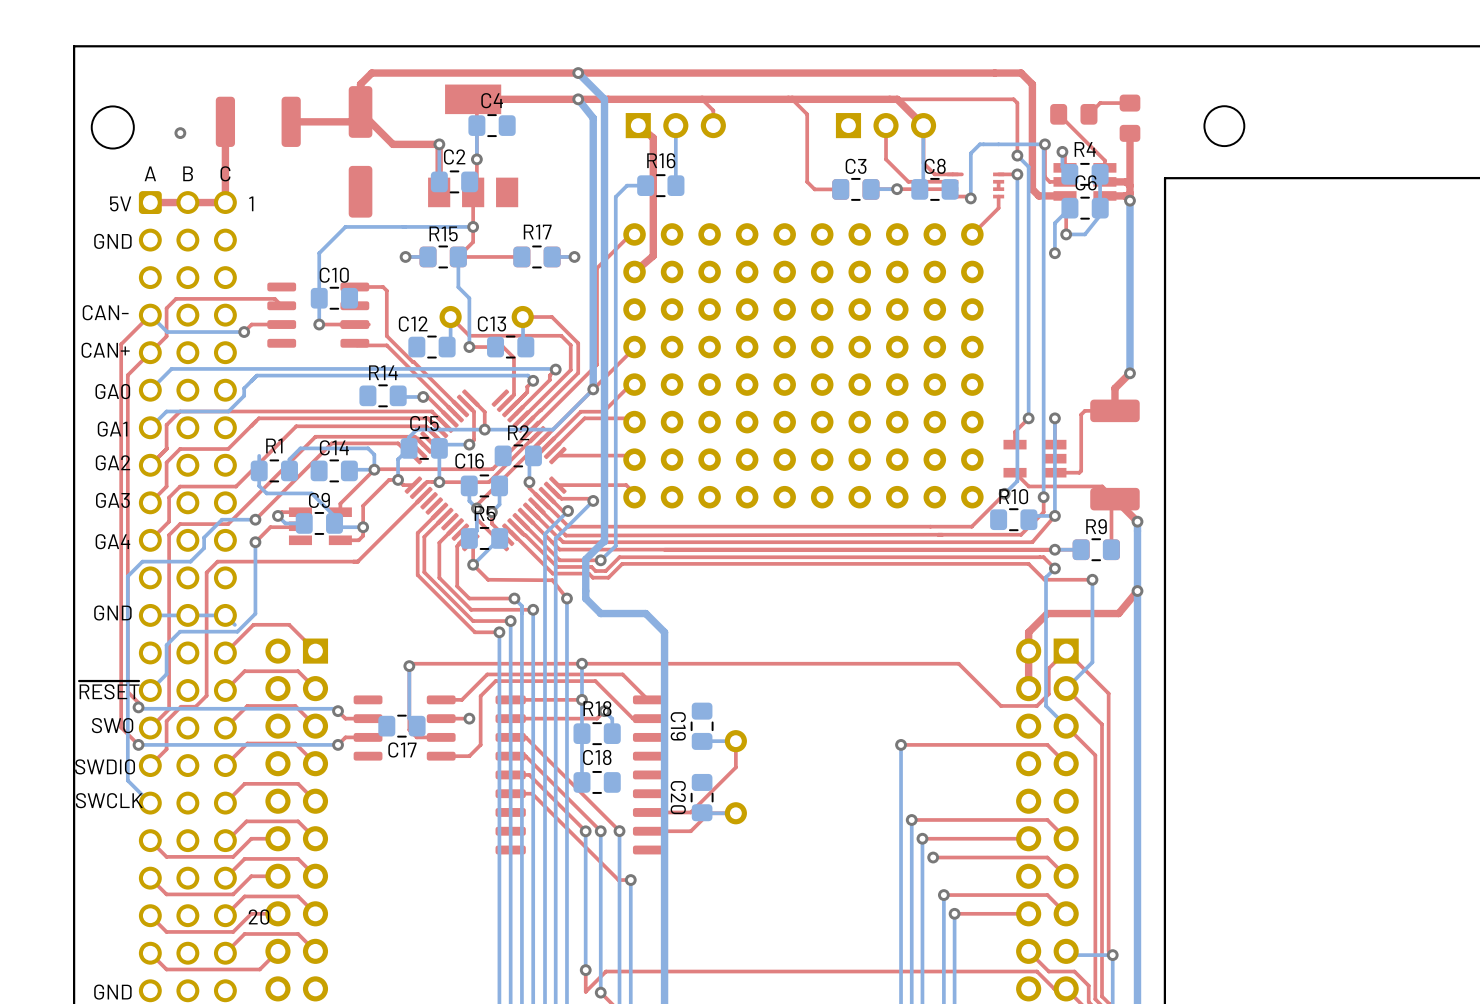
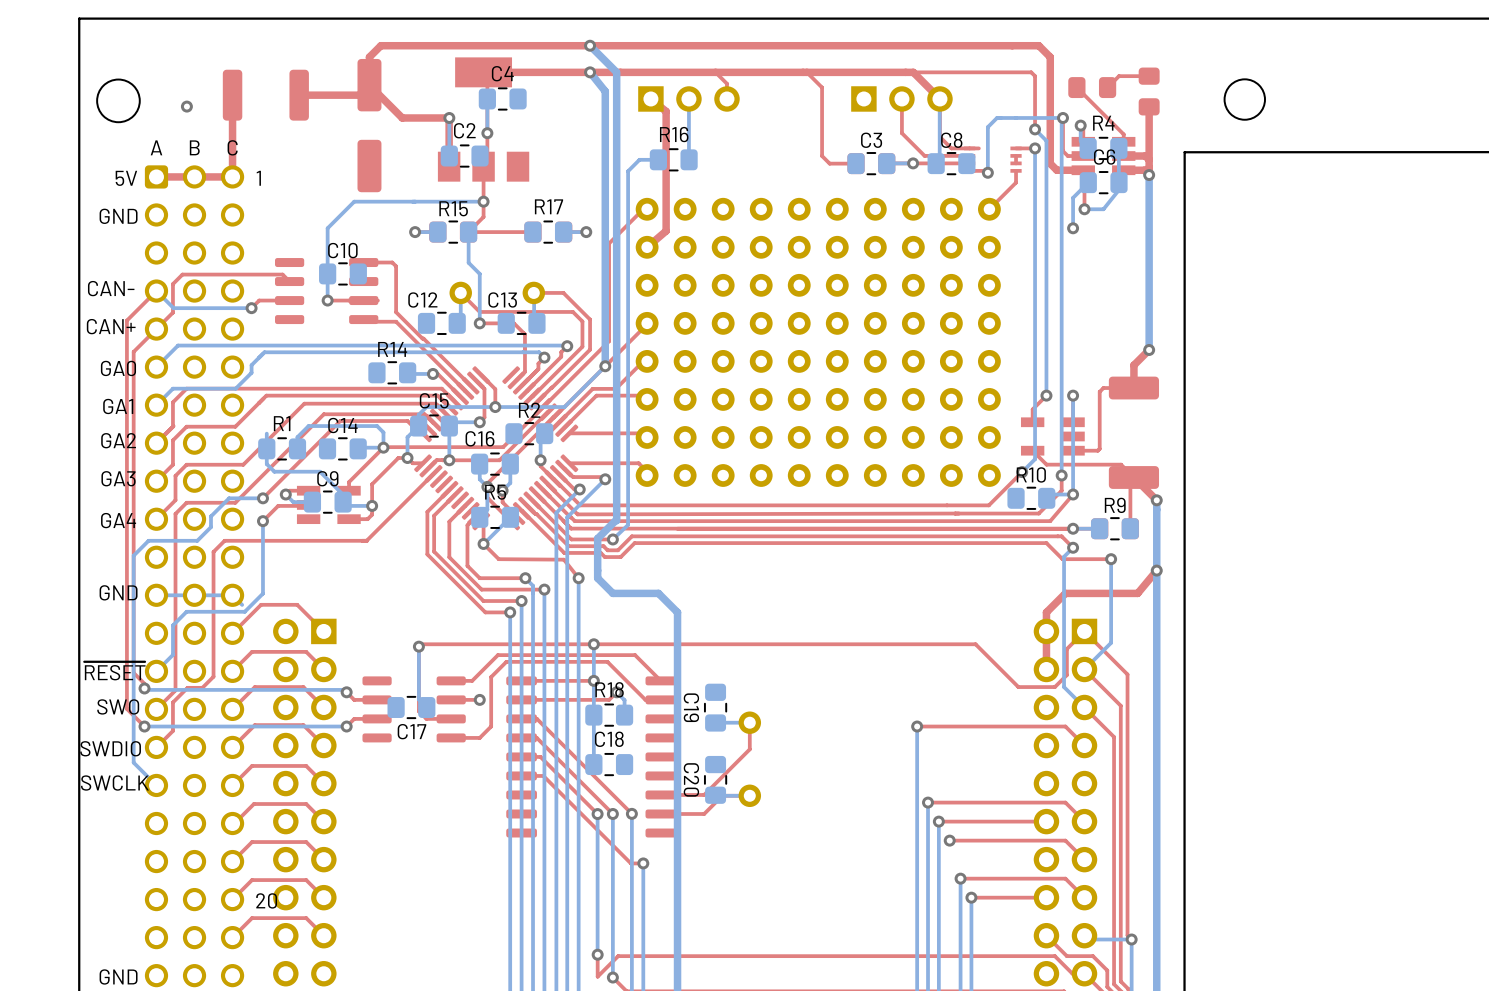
top track: (277, 838) (251, 838) (233, 856) (166, 856) (150, 840) -> none
top track: (277, 876) (251, 876) (233, 894) (166, 894) (150, 878) -> none
top track: (277, 913) (251, 913) (233, 931) (166, 931) (150, 915) -> none
top track: (277, 951) (259, 969) (166, 969) (150, 953) -> none

